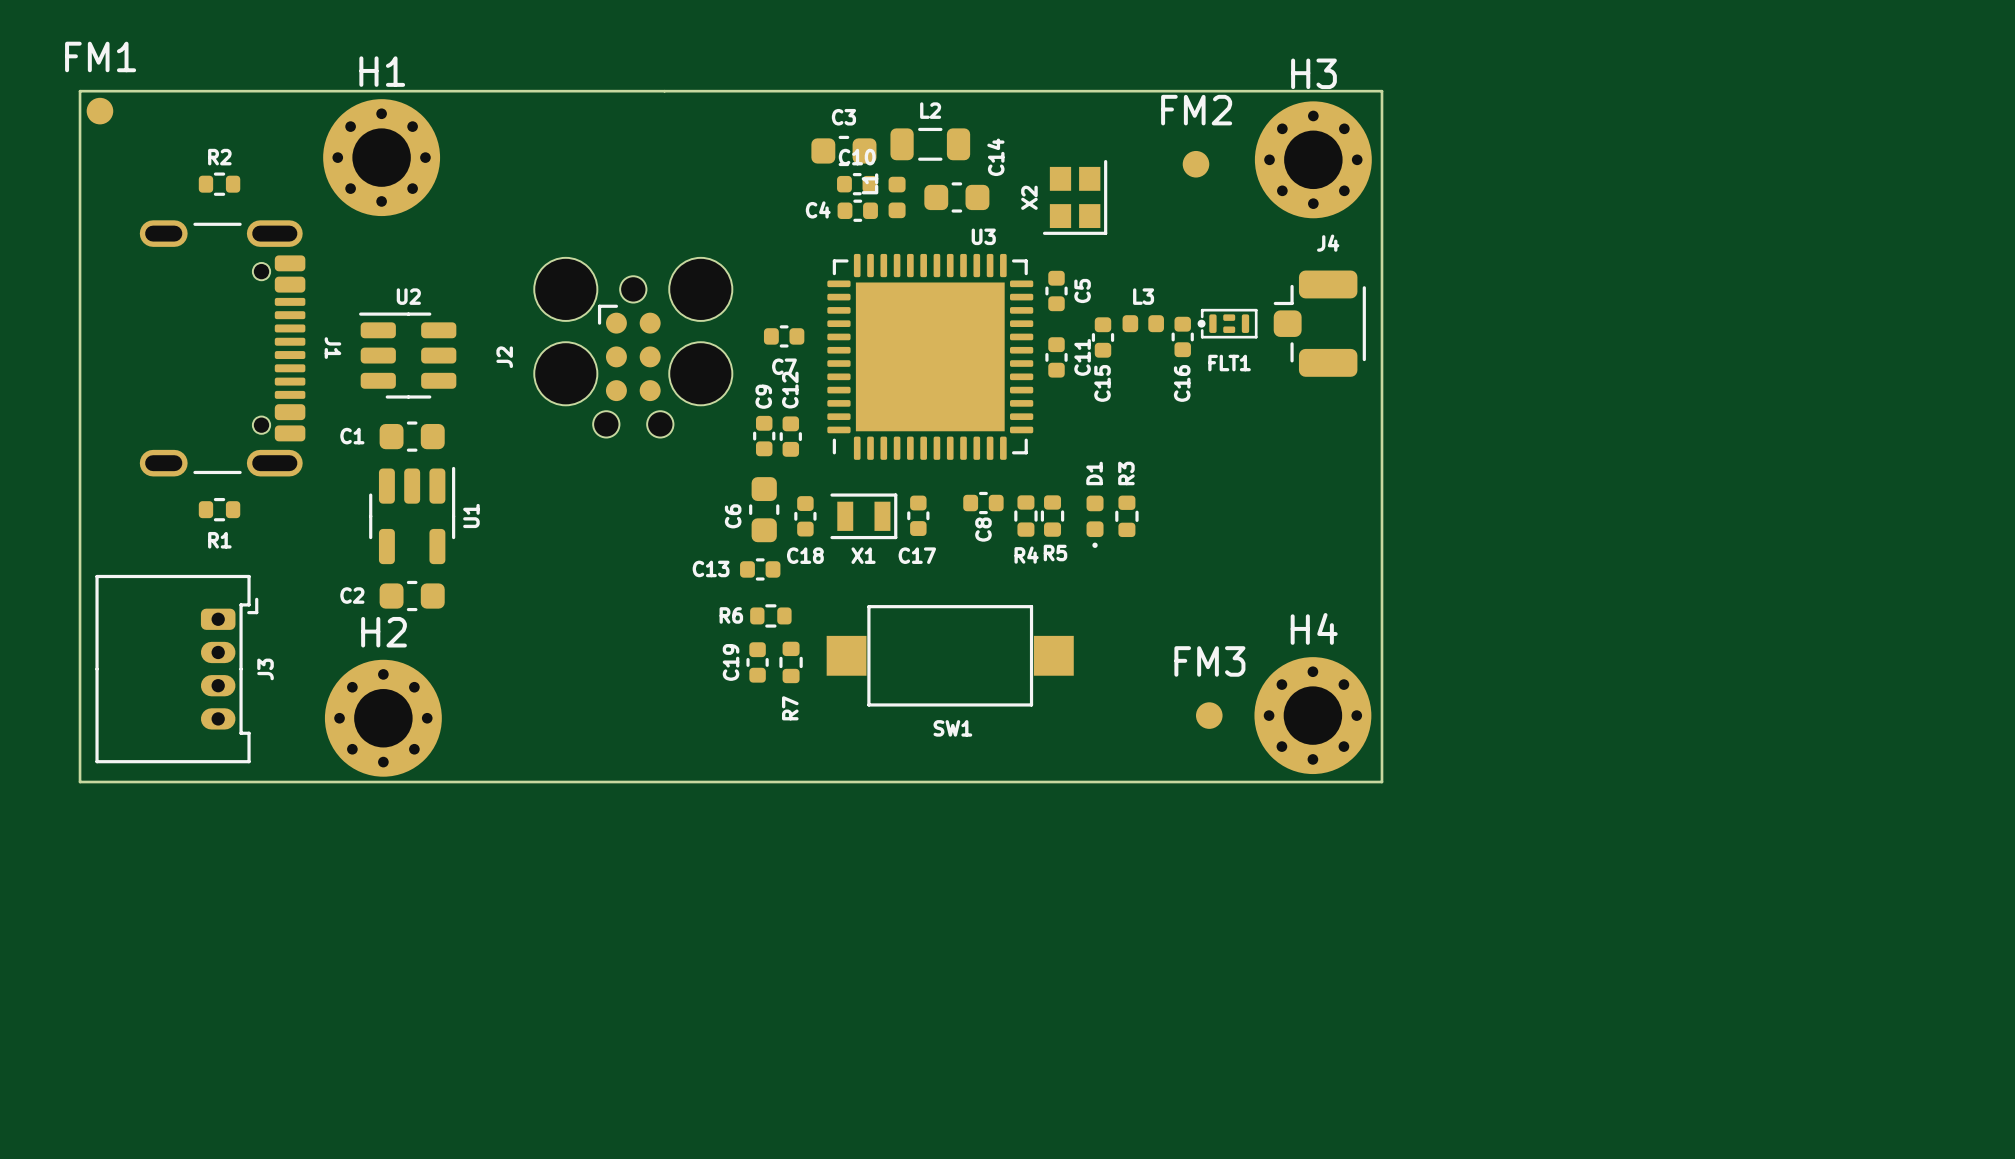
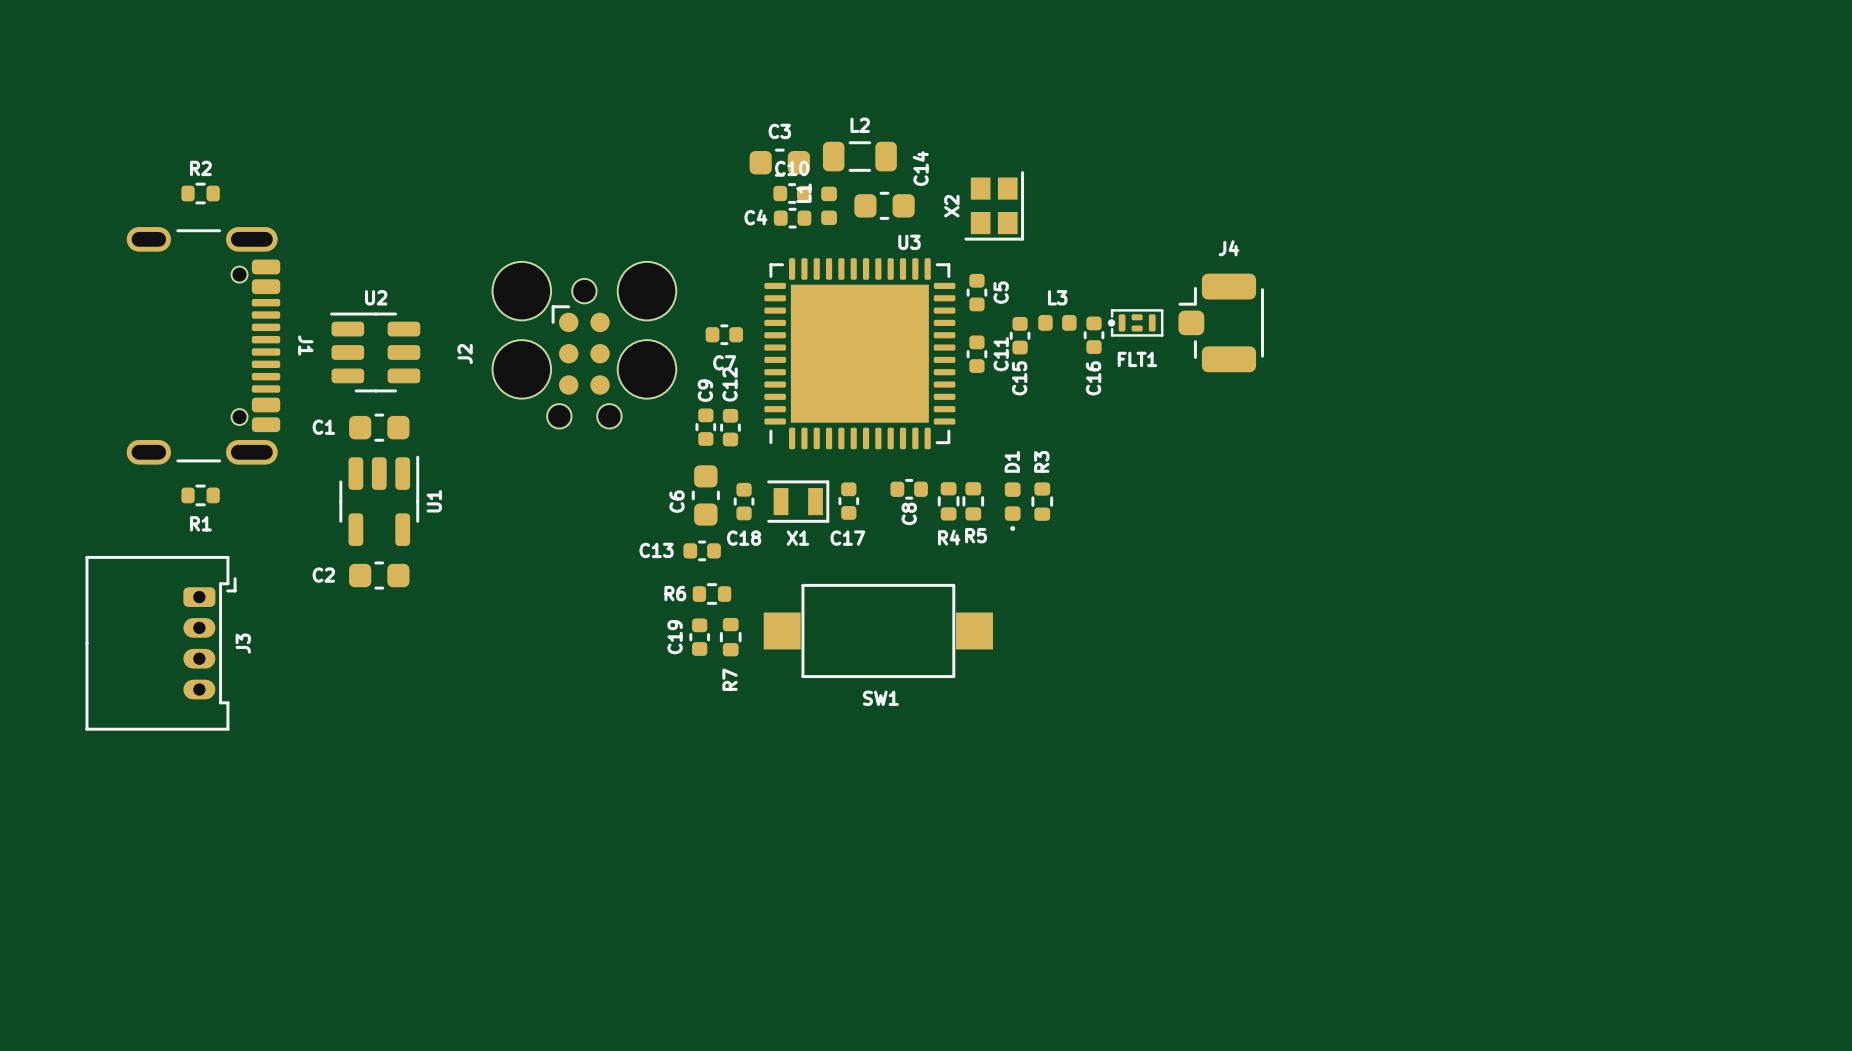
board edge: (80, 91) (1381, 91) (1381, 782) (80, 782) (80, 91) -> none
FM1: (99, 111) -> none
H1: (381, 157) -> none
H3: (1313, 159) -> none
FM2: (1196, 164) -> none
FM3: (1209, 715) -> none
H4: (1312, 715) -> none
H2: (383, 718) -> none

